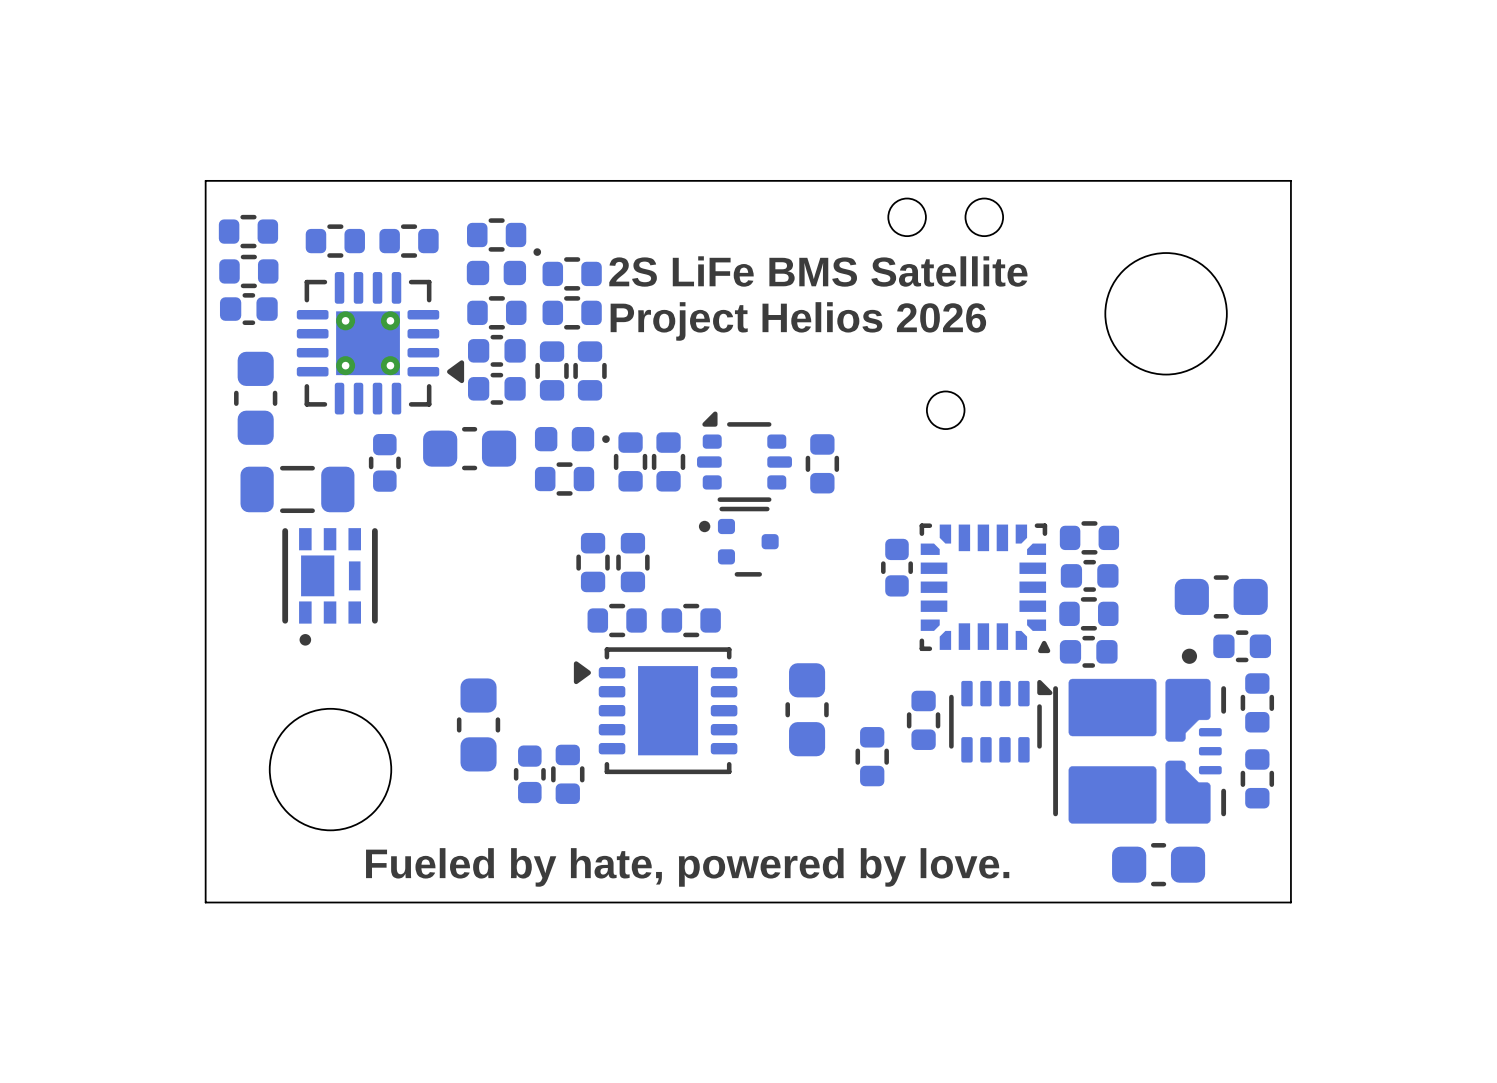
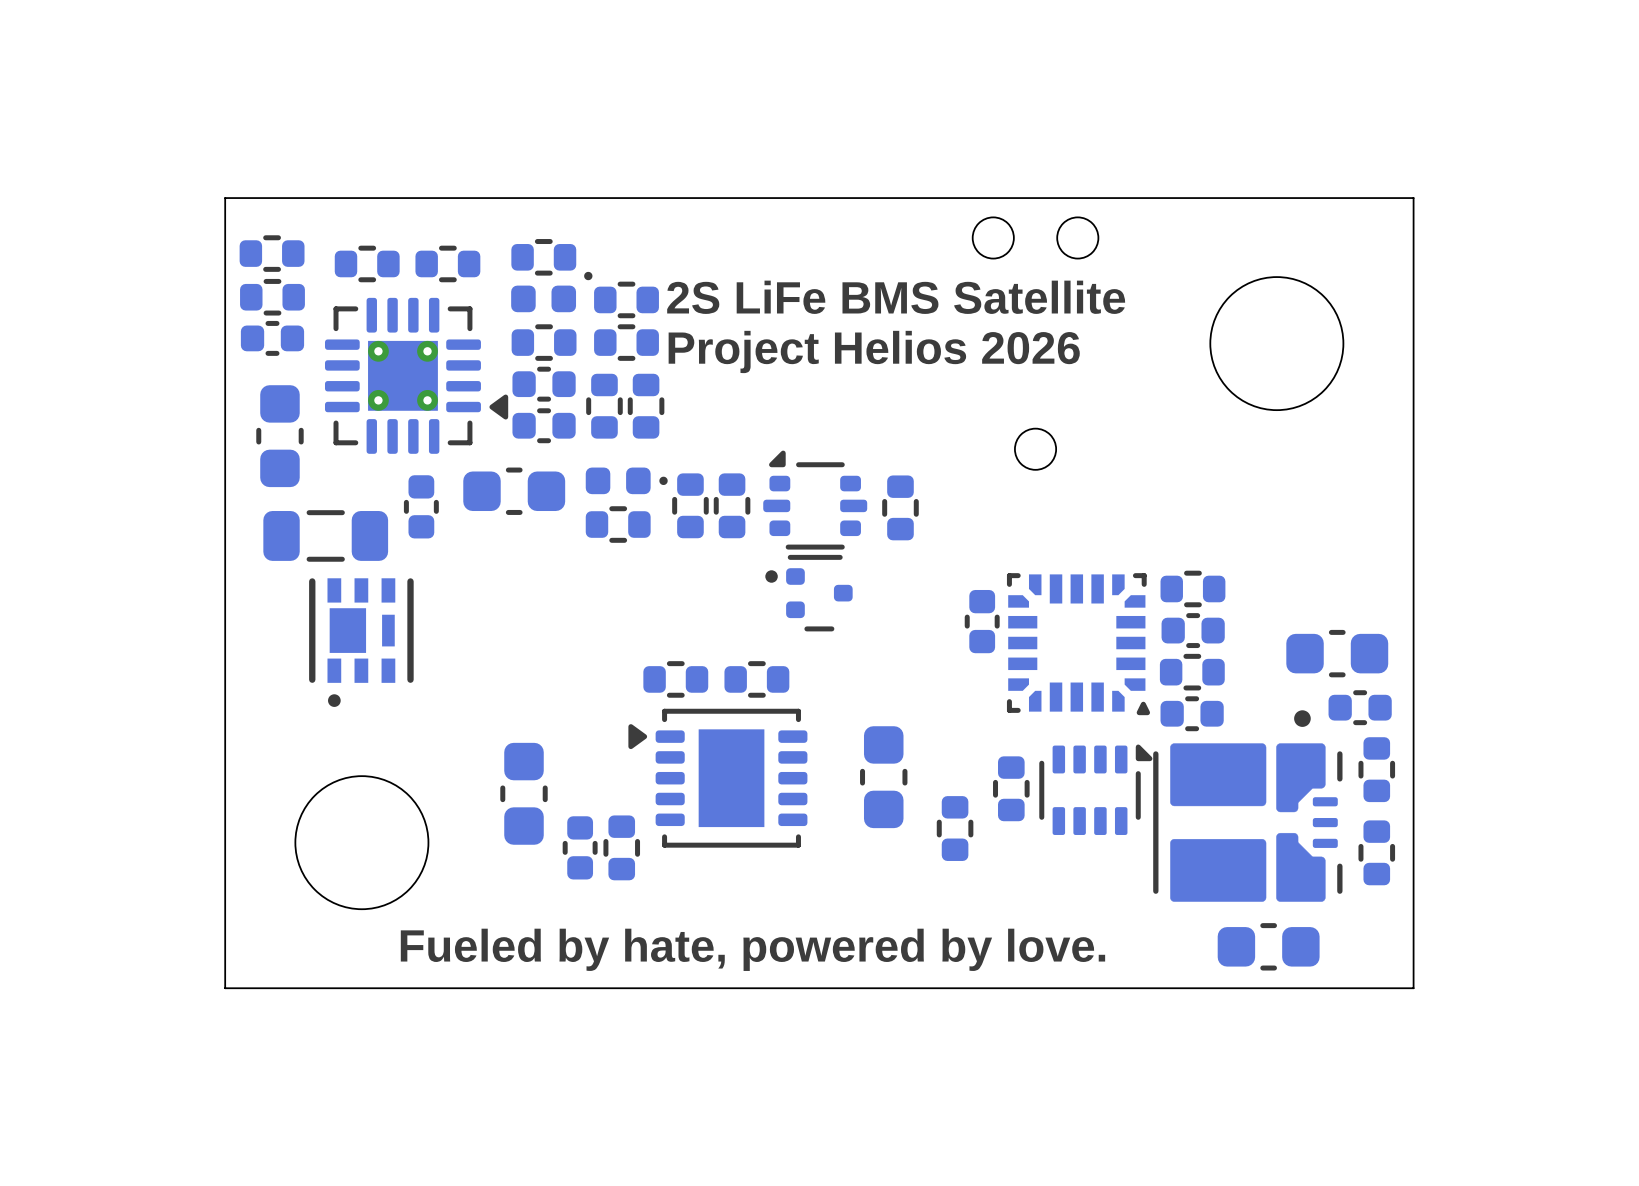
part: (593, 562) -> none
part: (632, 562) -> none

